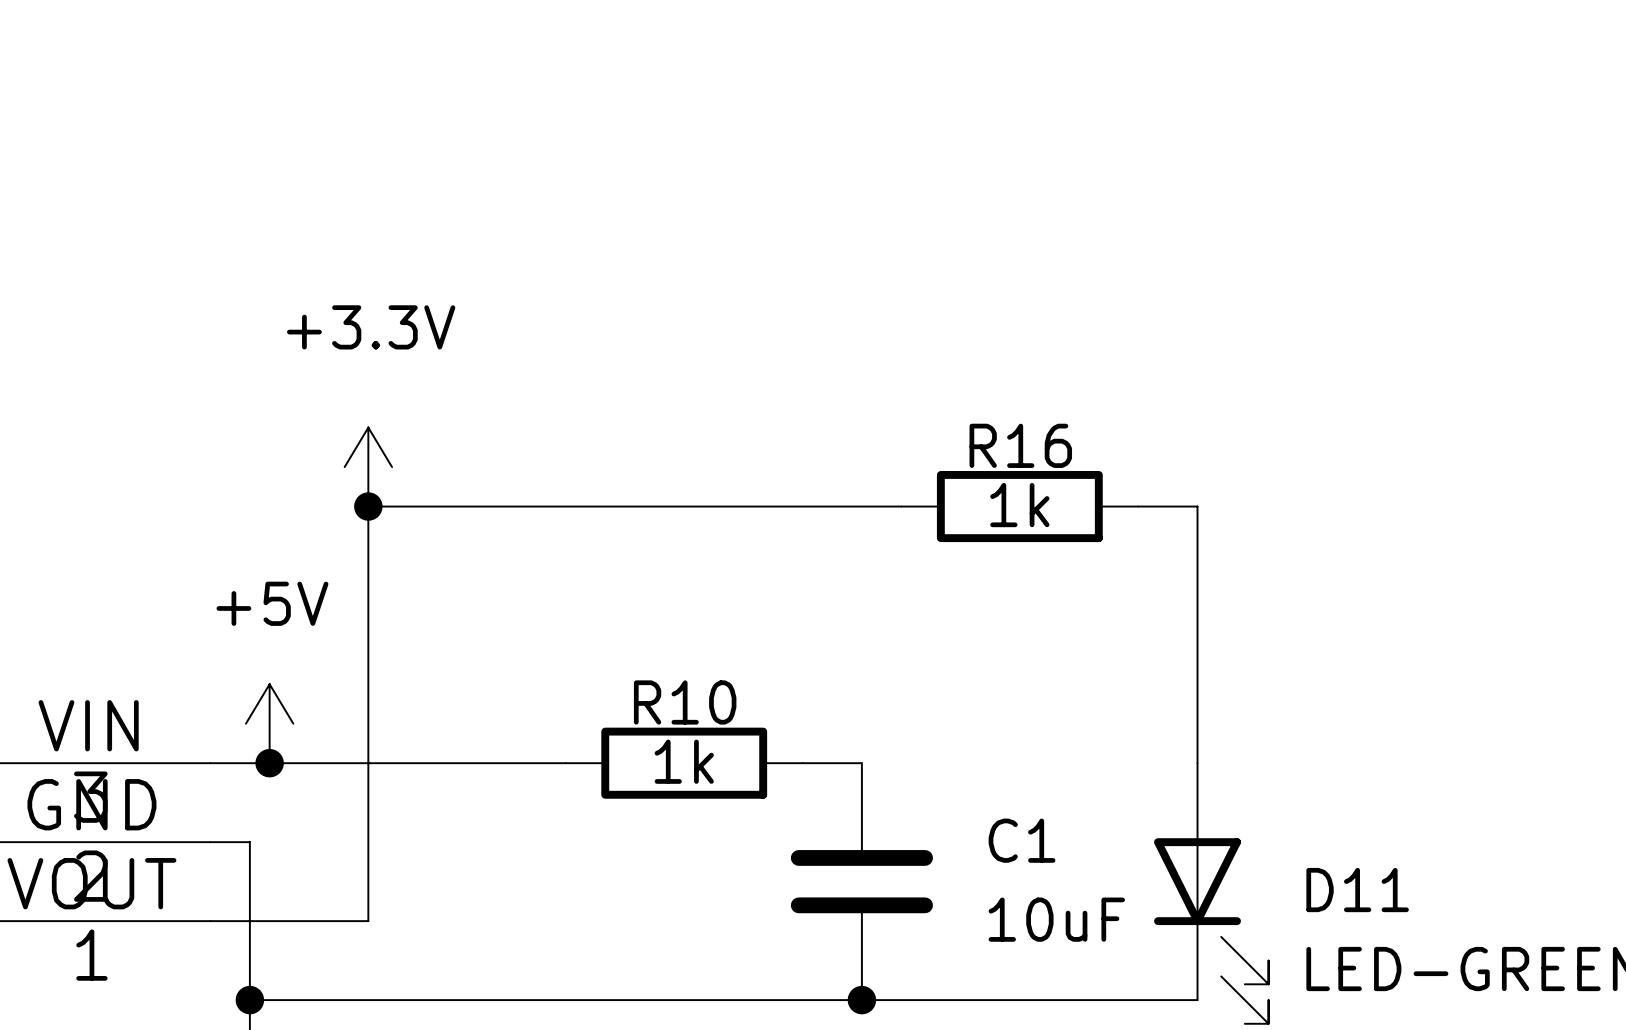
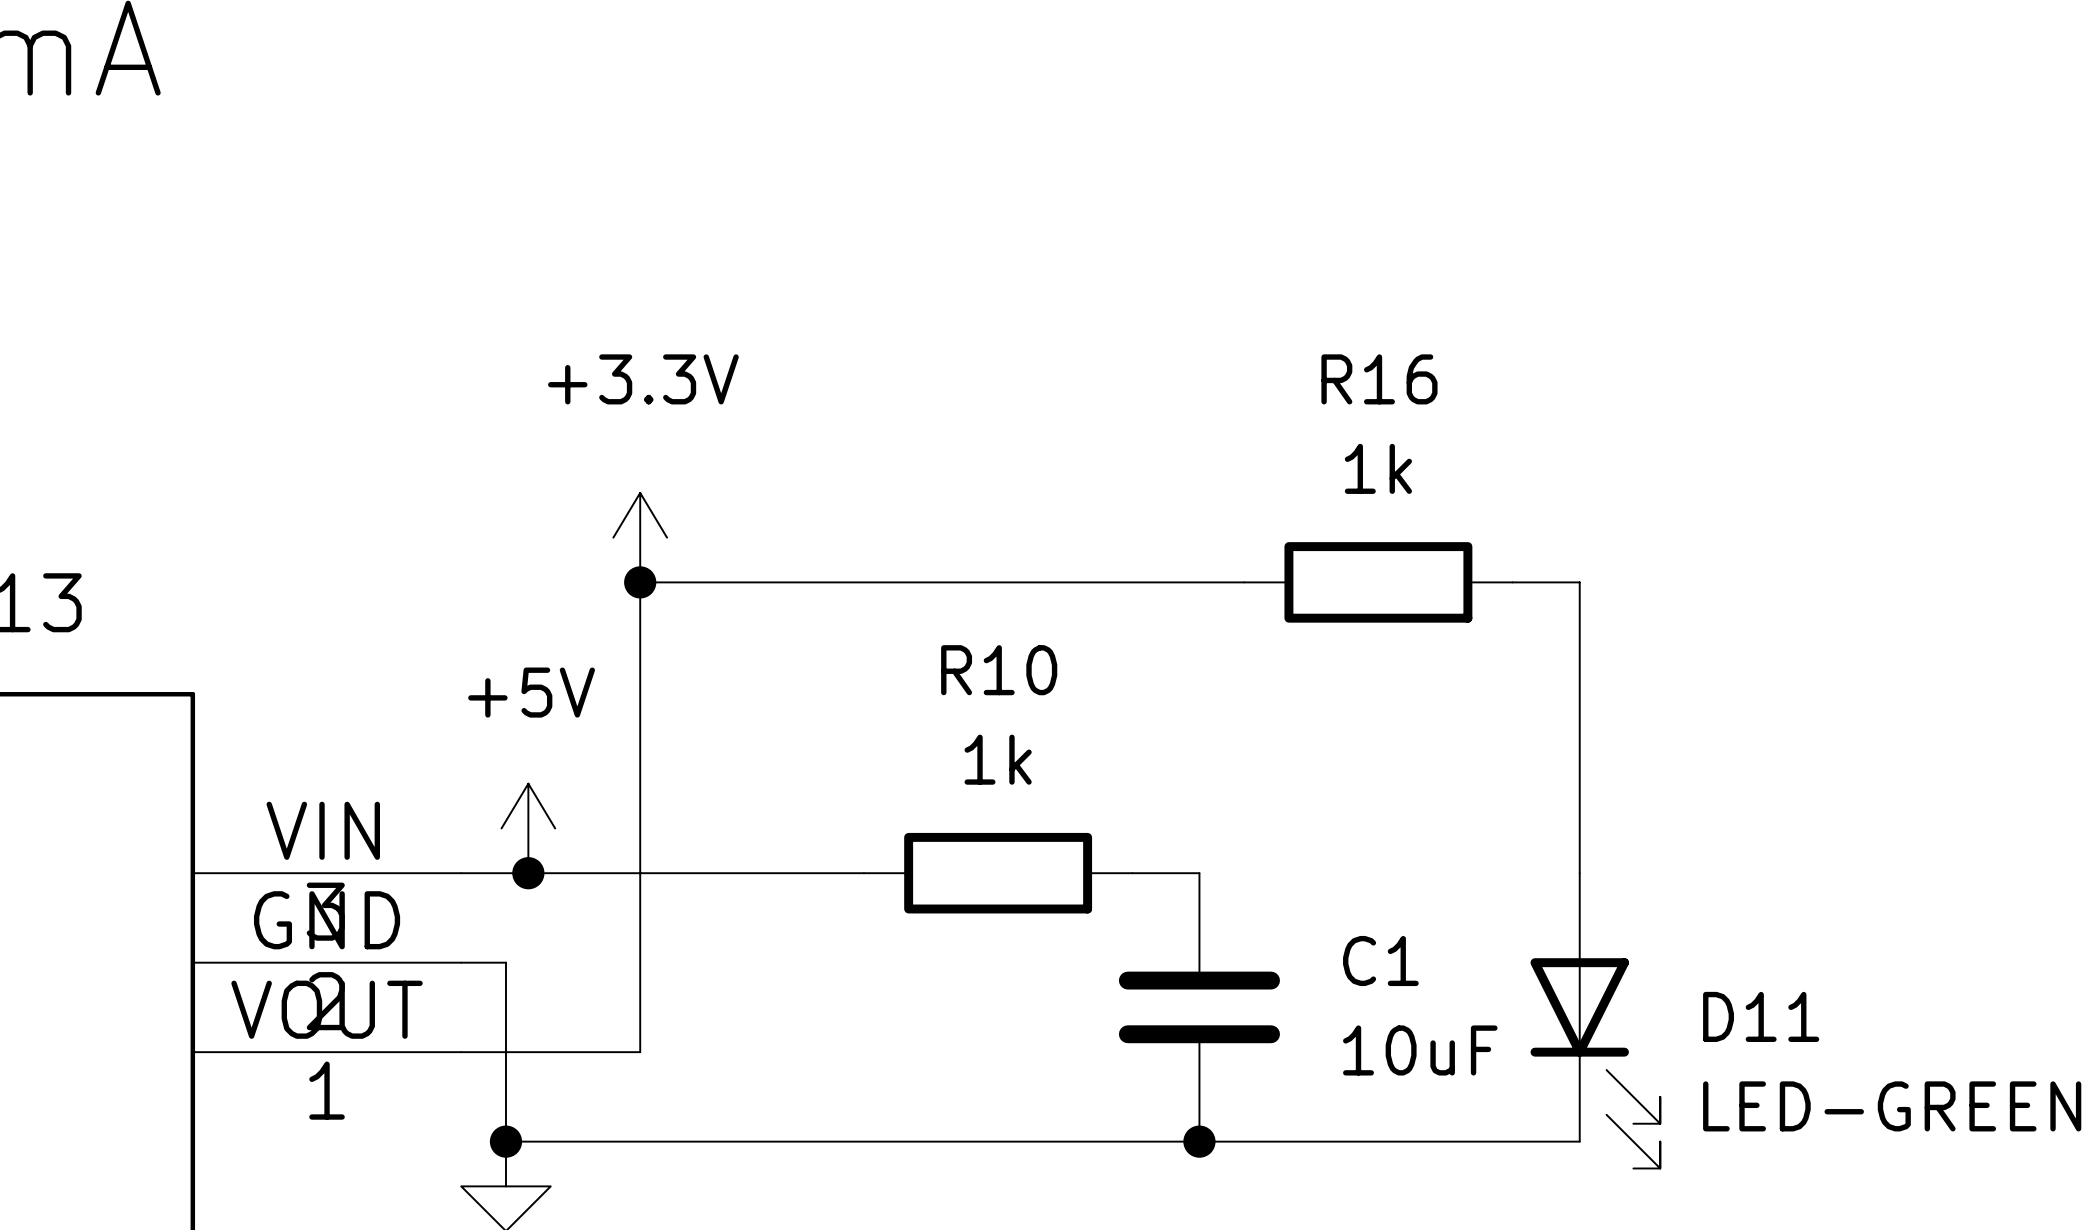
R16 name position: R16 (1020, 445) -> R16 (1379, 379)
R16 value position: 1k (1019, 505) -> 1k (1378, 468)
R10 name position: R10 (685, 702) -> R10 (999, 670)
R10 value position: 1k (684, 761) -> 1k (998, 759)

